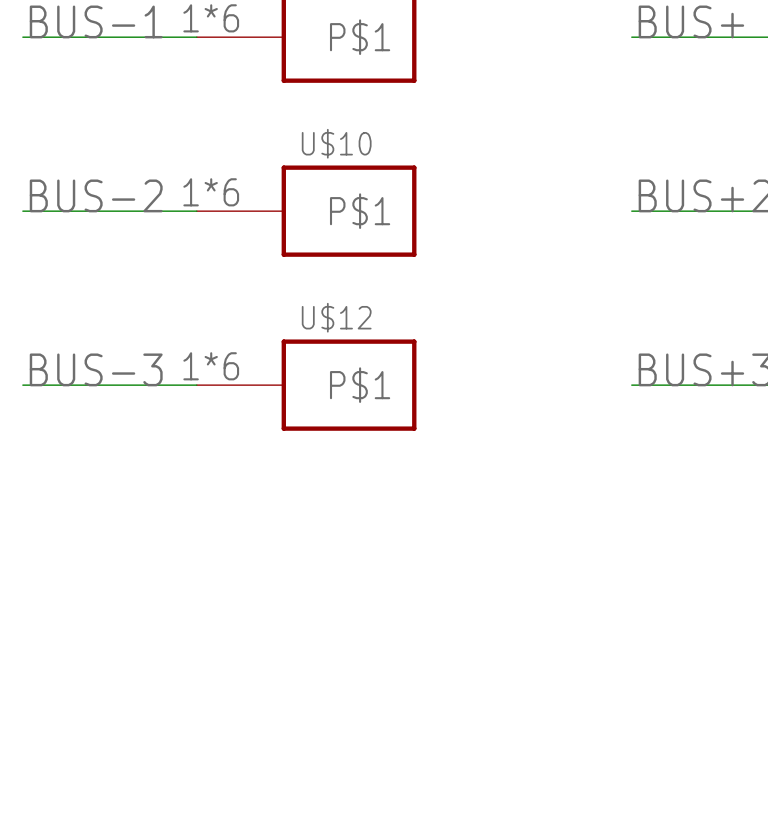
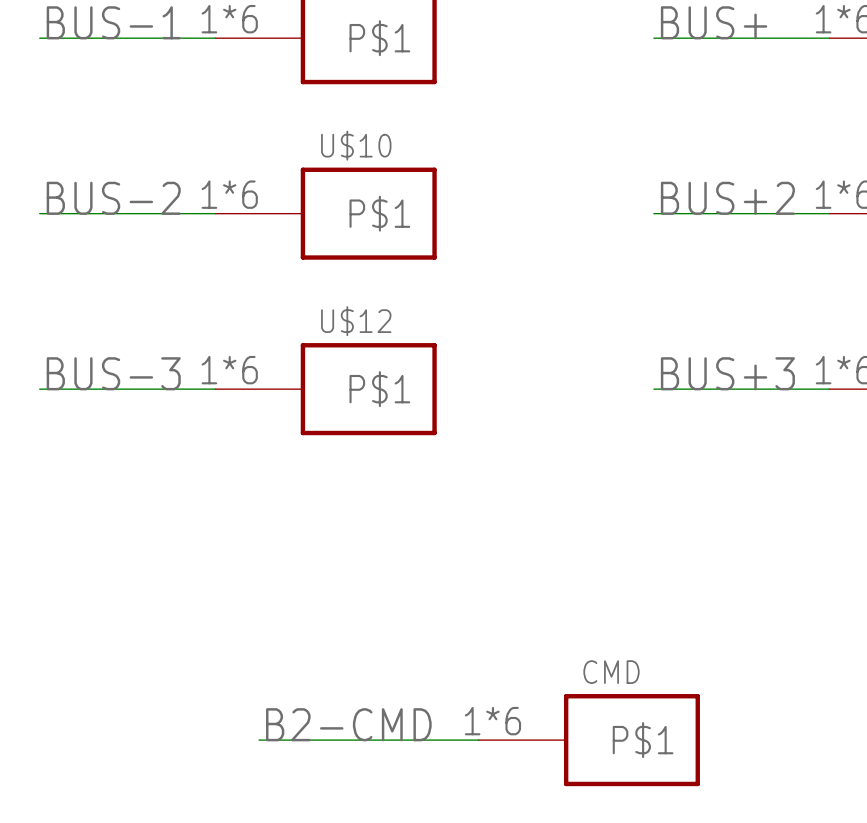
label: none -> B2-CMD (348, 724)
wire: none -> (259, 740) (478, 740)
CMD: none -> (589, 740)

